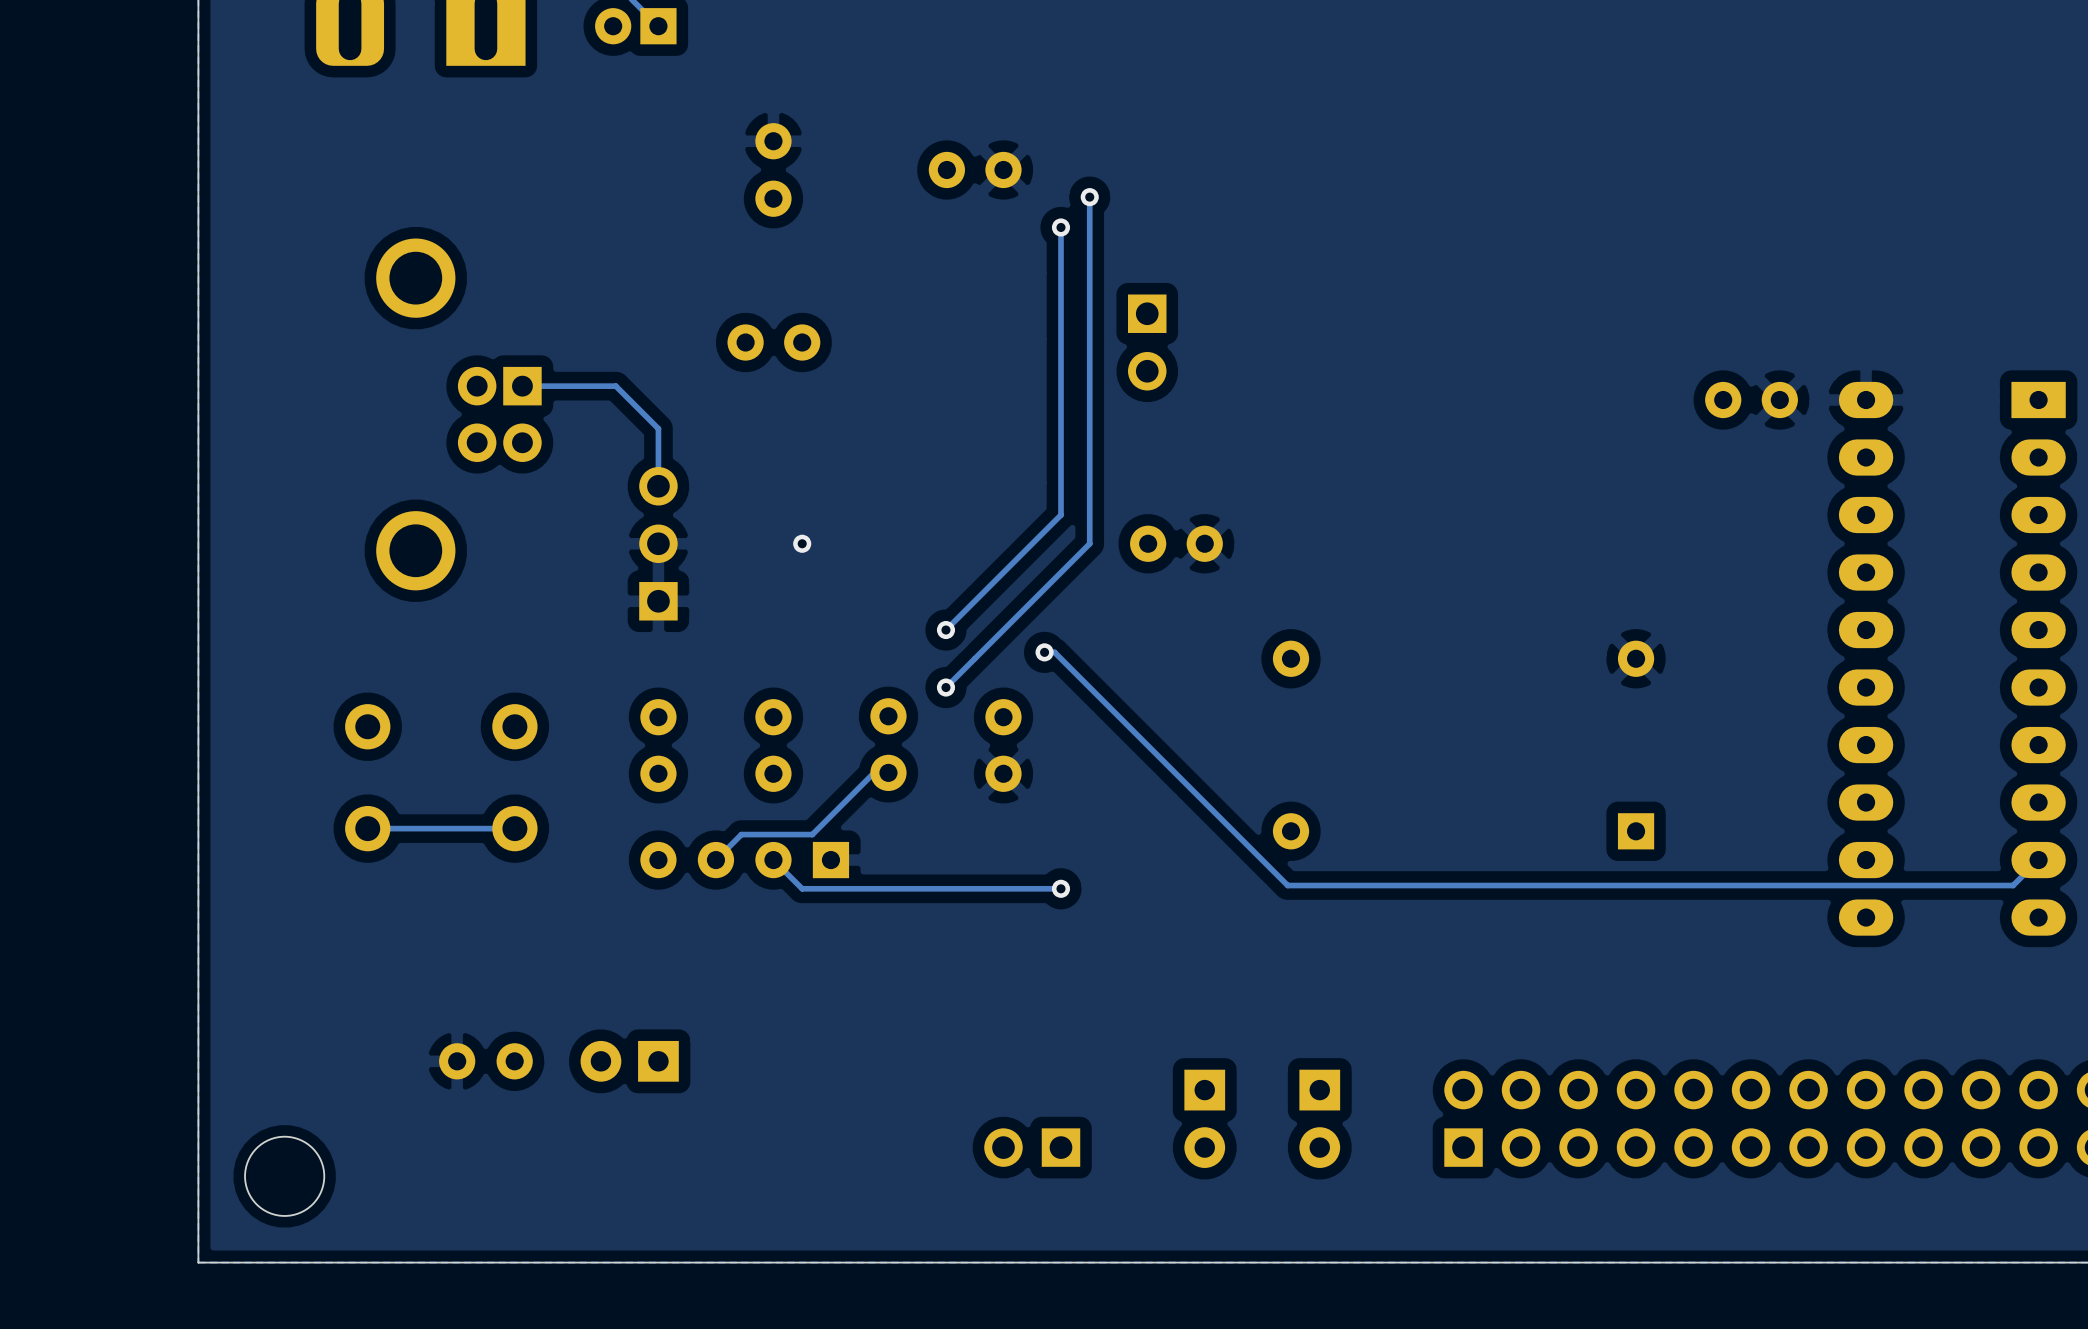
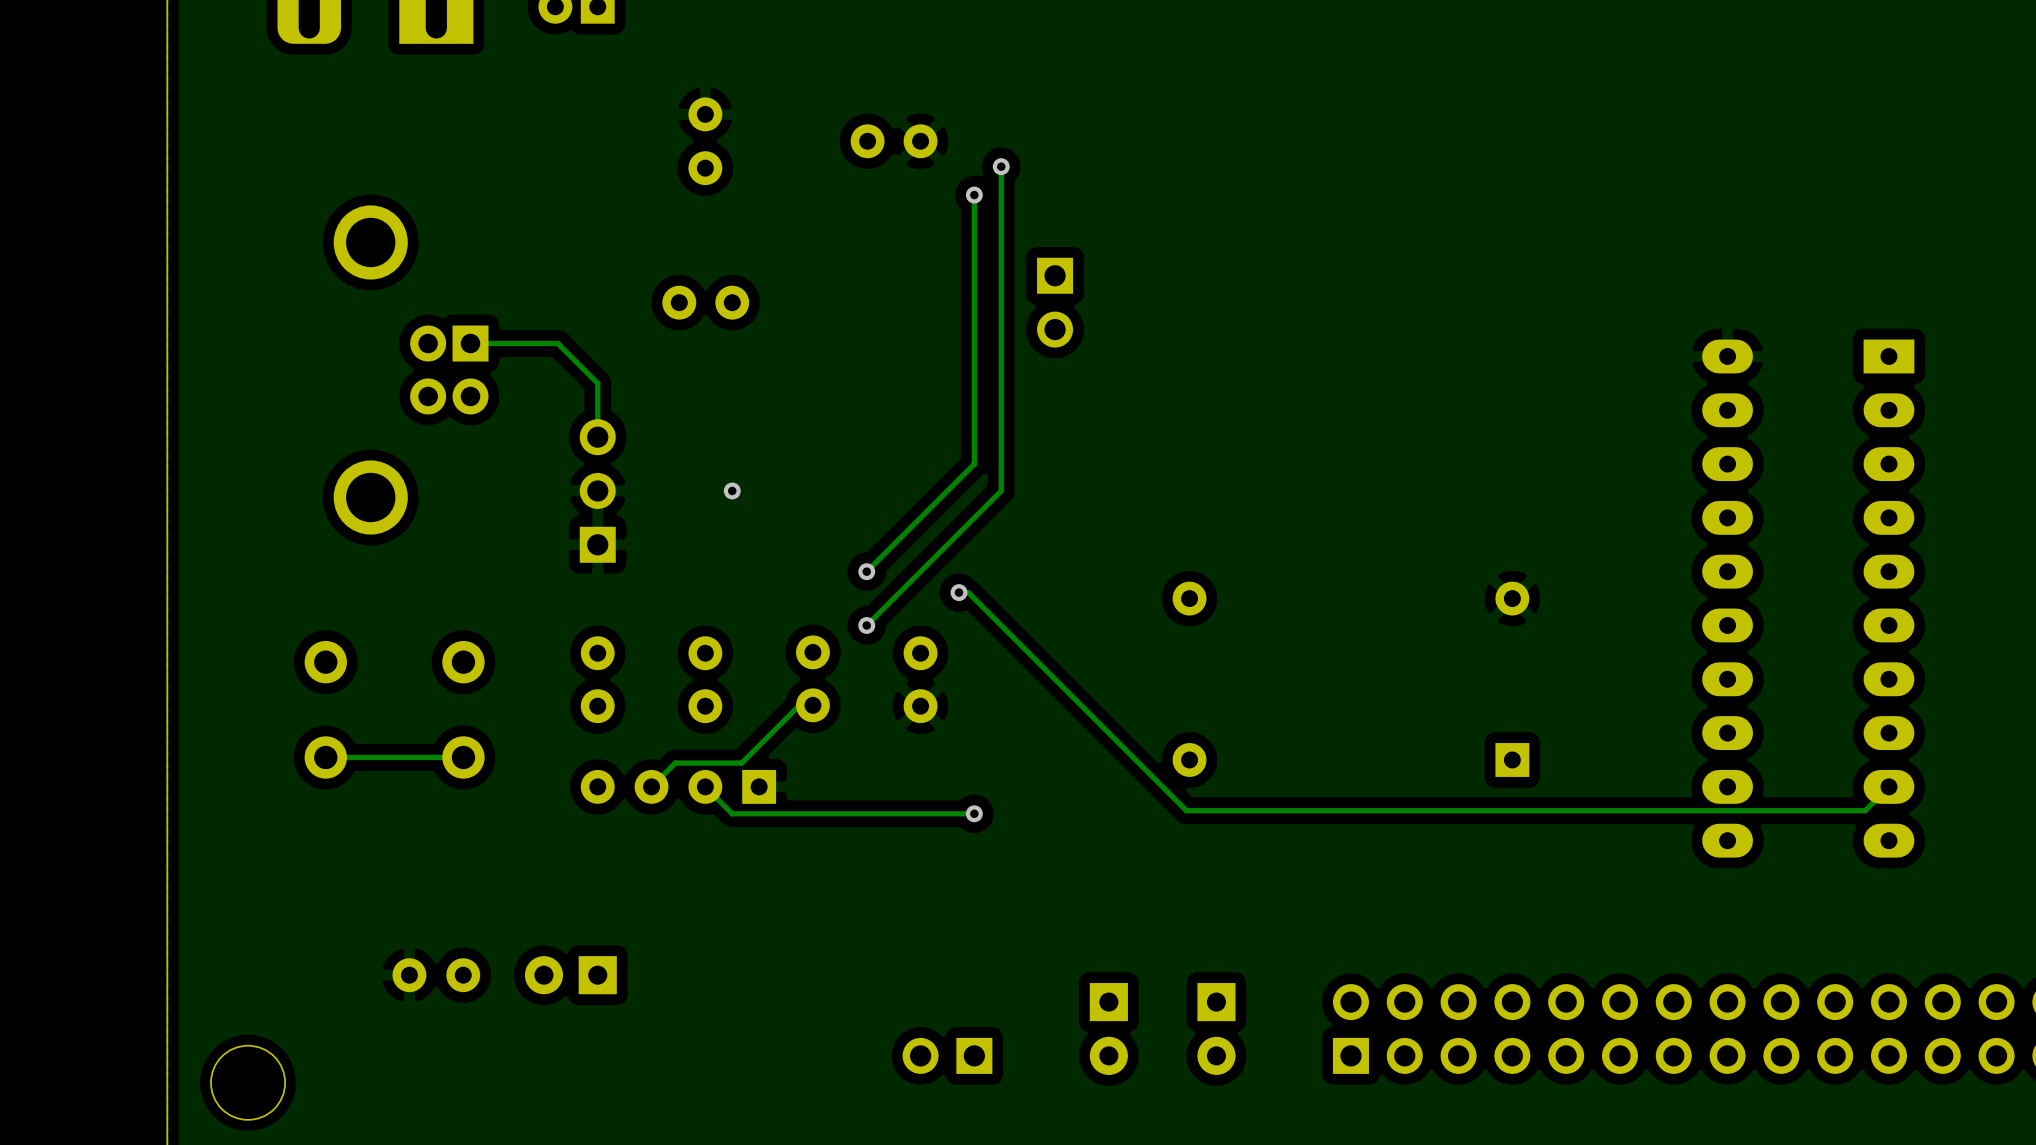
part: (1751, 400) -> none
part: (1176, 543) -> none

